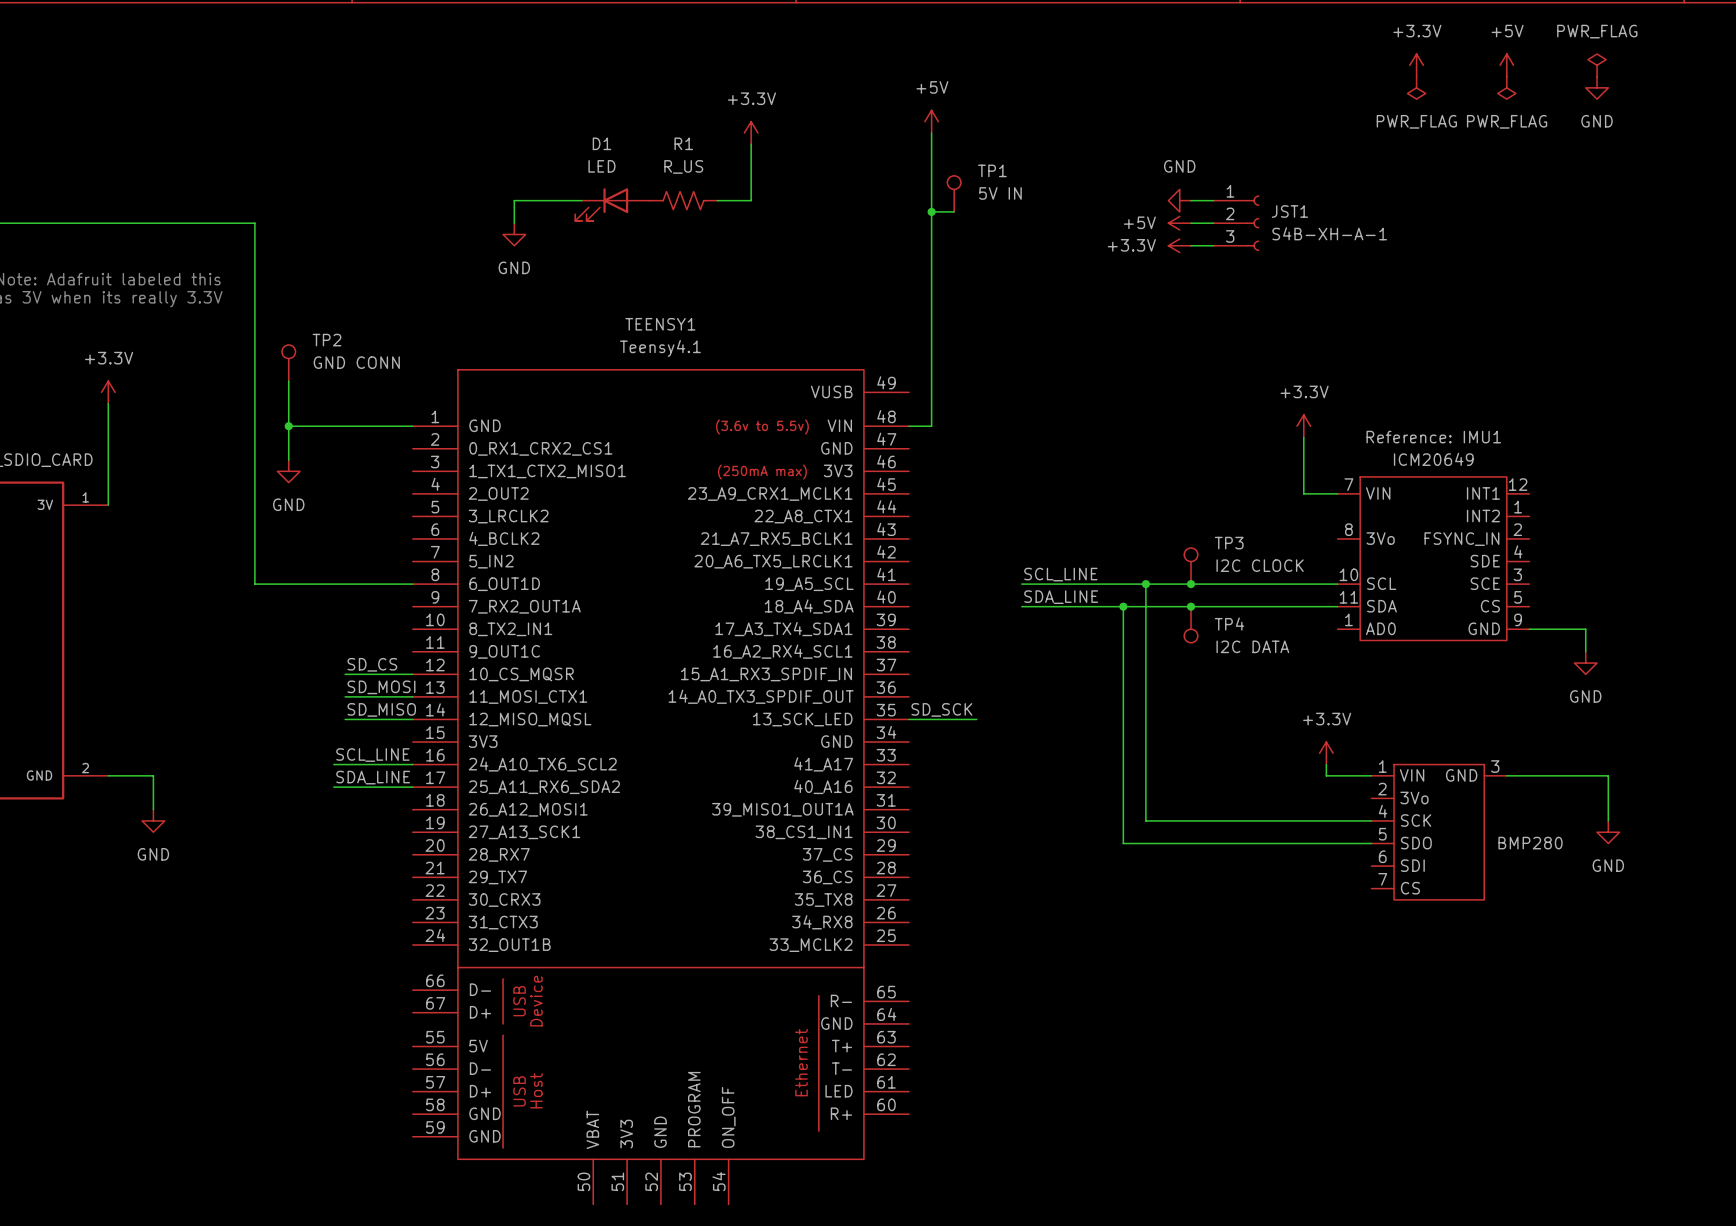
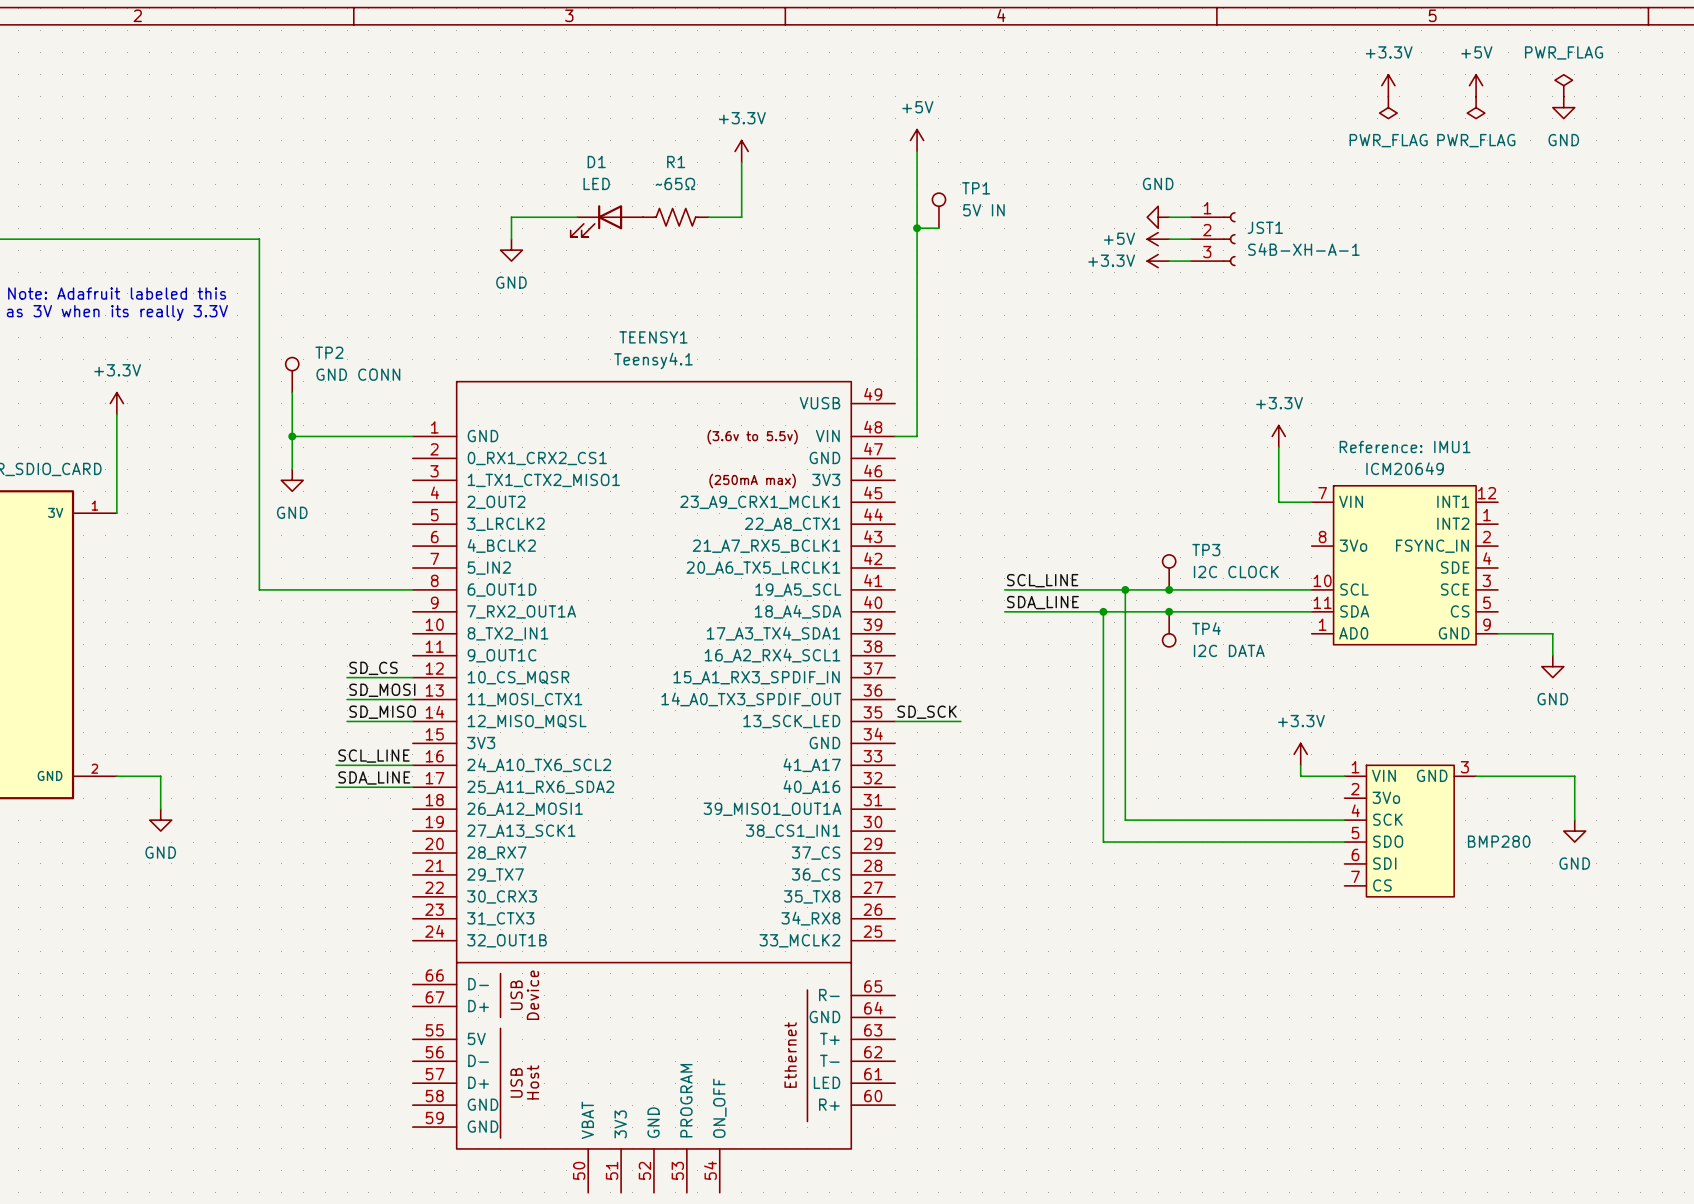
R1 value: R_US (683, 166) -> ~65Ω (675, 183)

